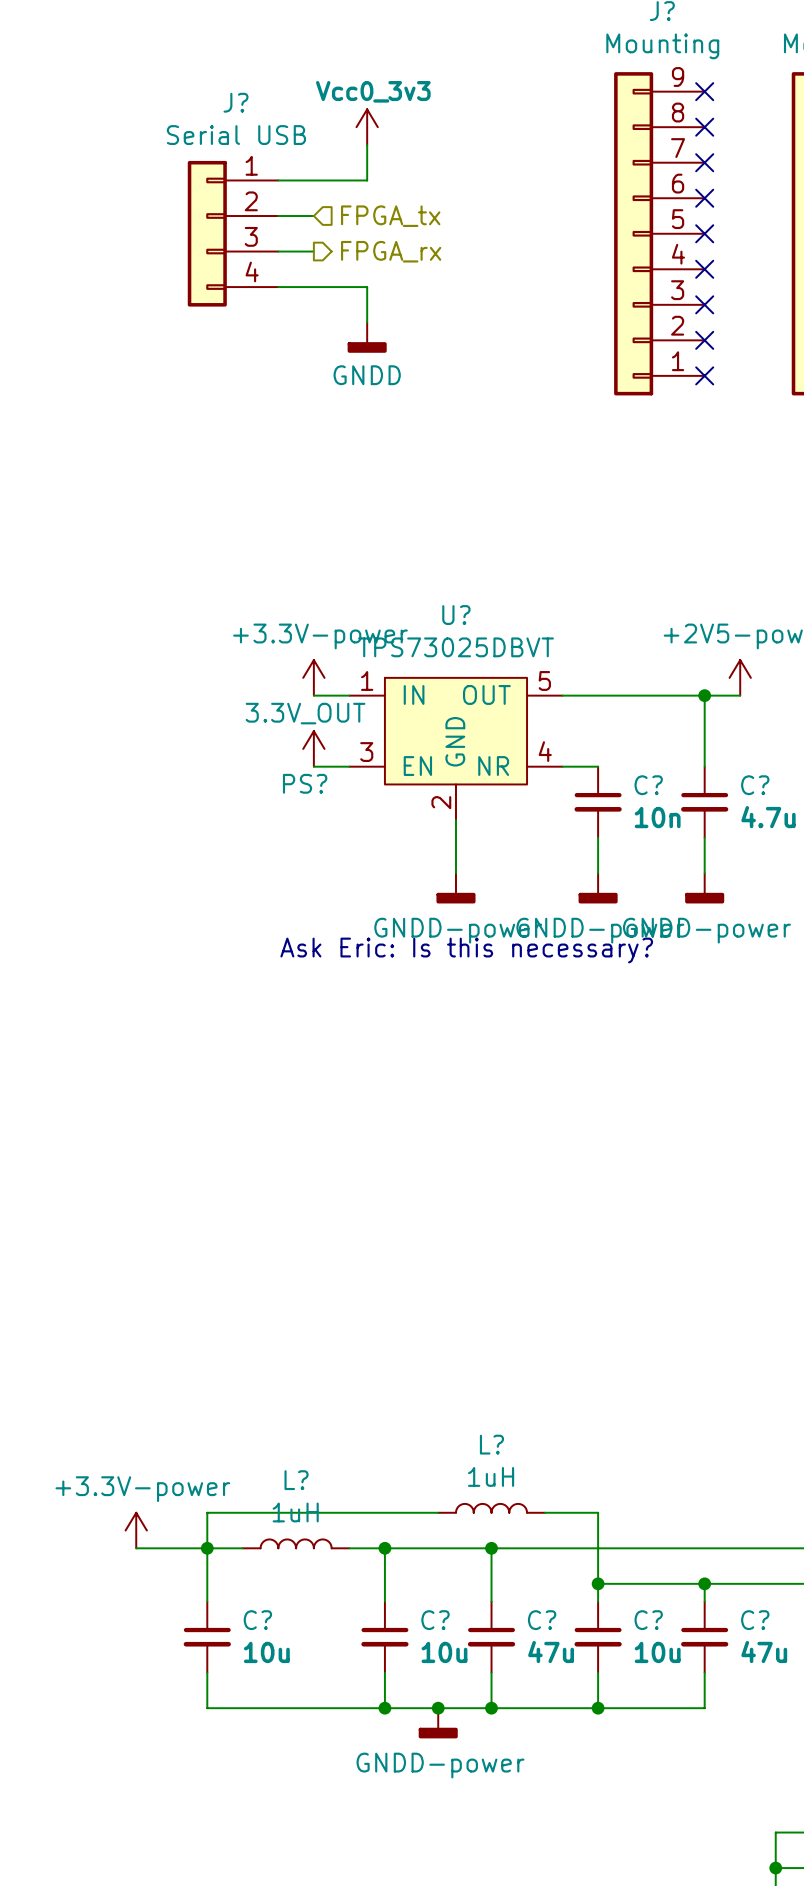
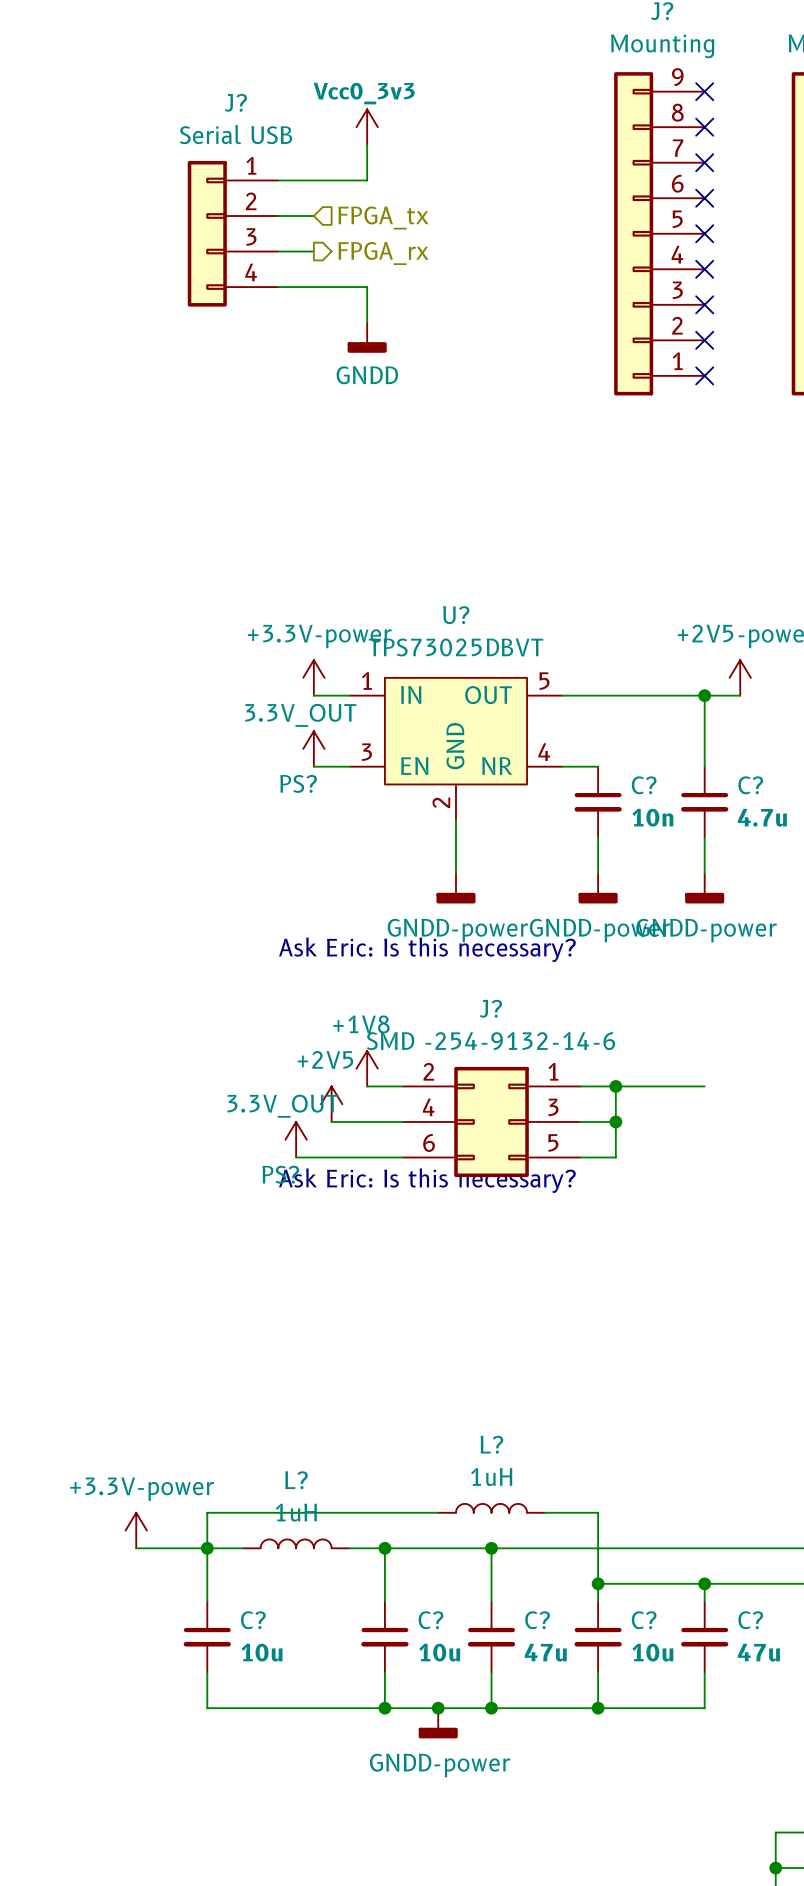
power symbol: none -> +1V8 (367, 1068)
wire: none -> (367, 1086) (402, 1086)
wire: none -> (580, 1086) (704, 1086)
wire: none -> (615, 1086) (615, 1157) (580, 1157)
junction: none -> (615, 1086)
power symbol: none -> +2V5 (331, 1104)
wire: none -> (331, 1121) (402, 1121)
J?: none -> SMD -254-9132-14-6 (491, 1121)
wire: none -> (580, 1121) (615, 1121)
junction: none -> (615, 1121)
PS?: none -> 3.3V_OUT (296, 1139)
wire: none -> (296, 1157) (402, 1157)
text: none -> Ask Eric: Is this necessary? (427, 1180)

